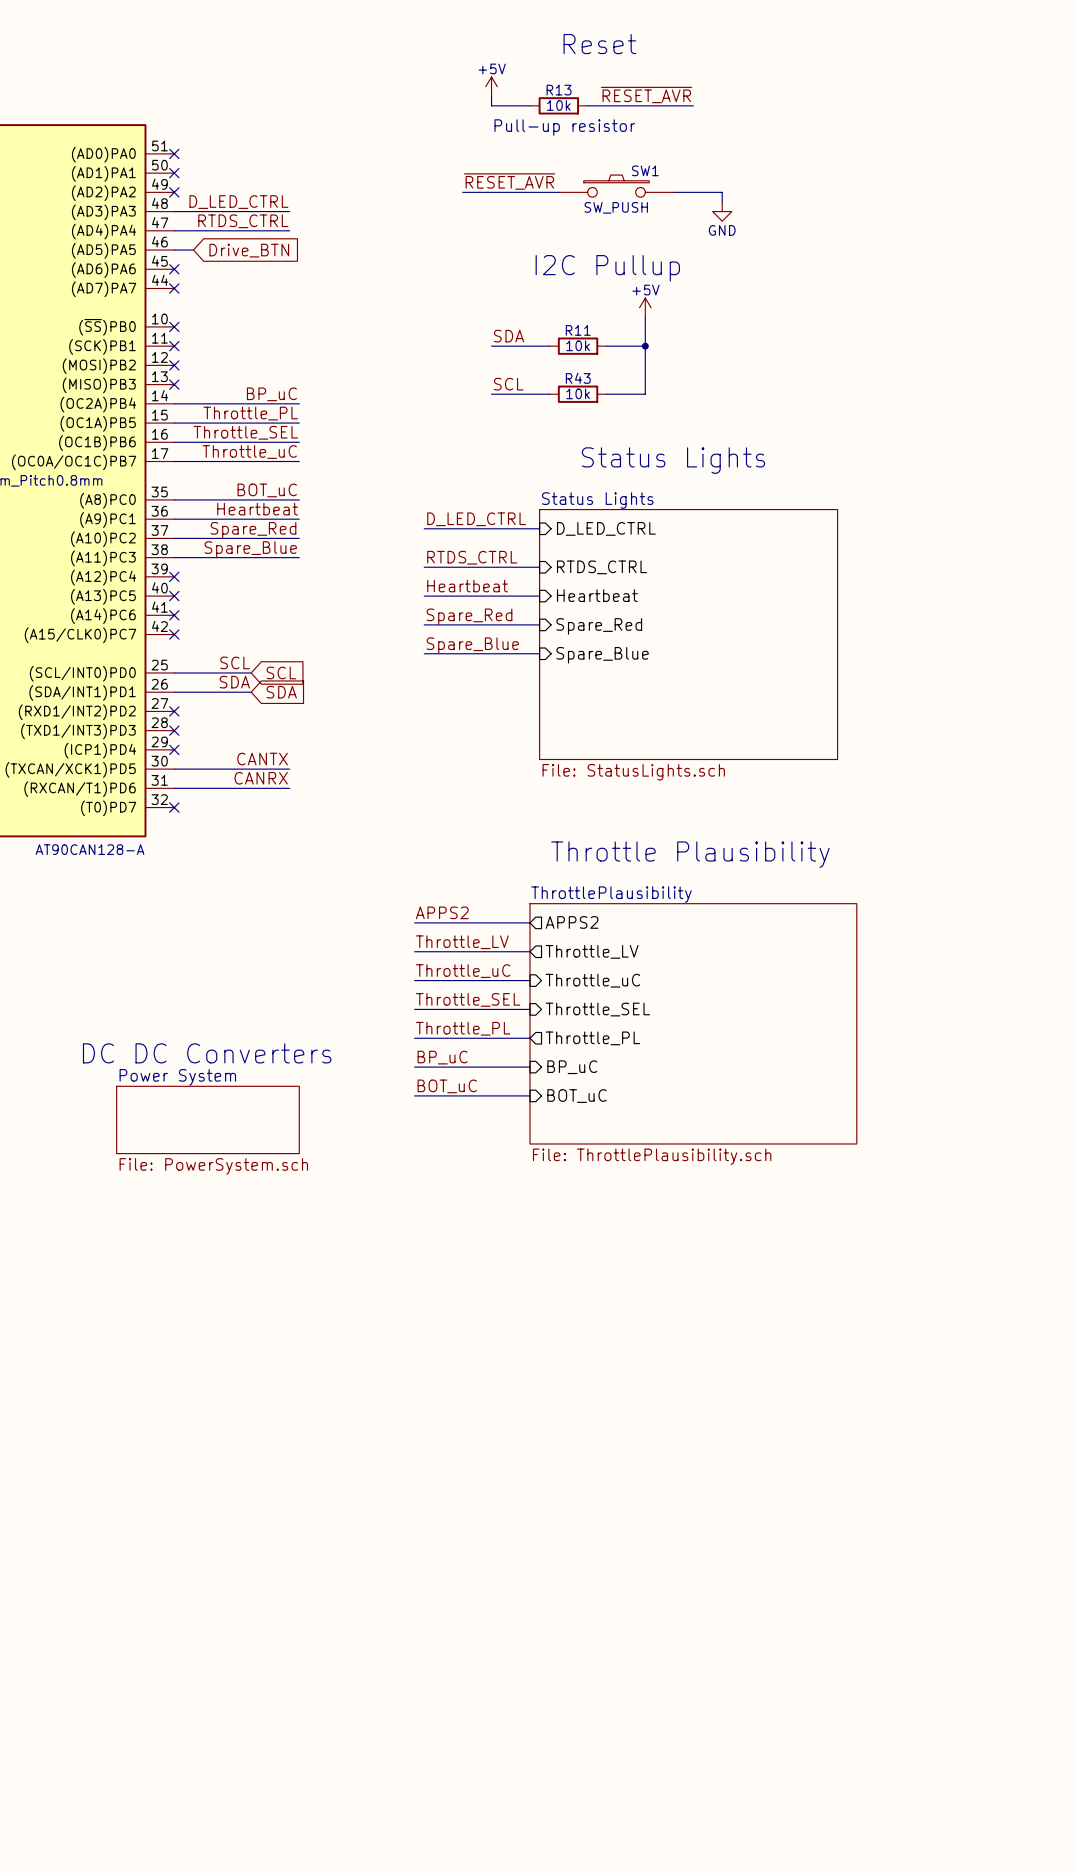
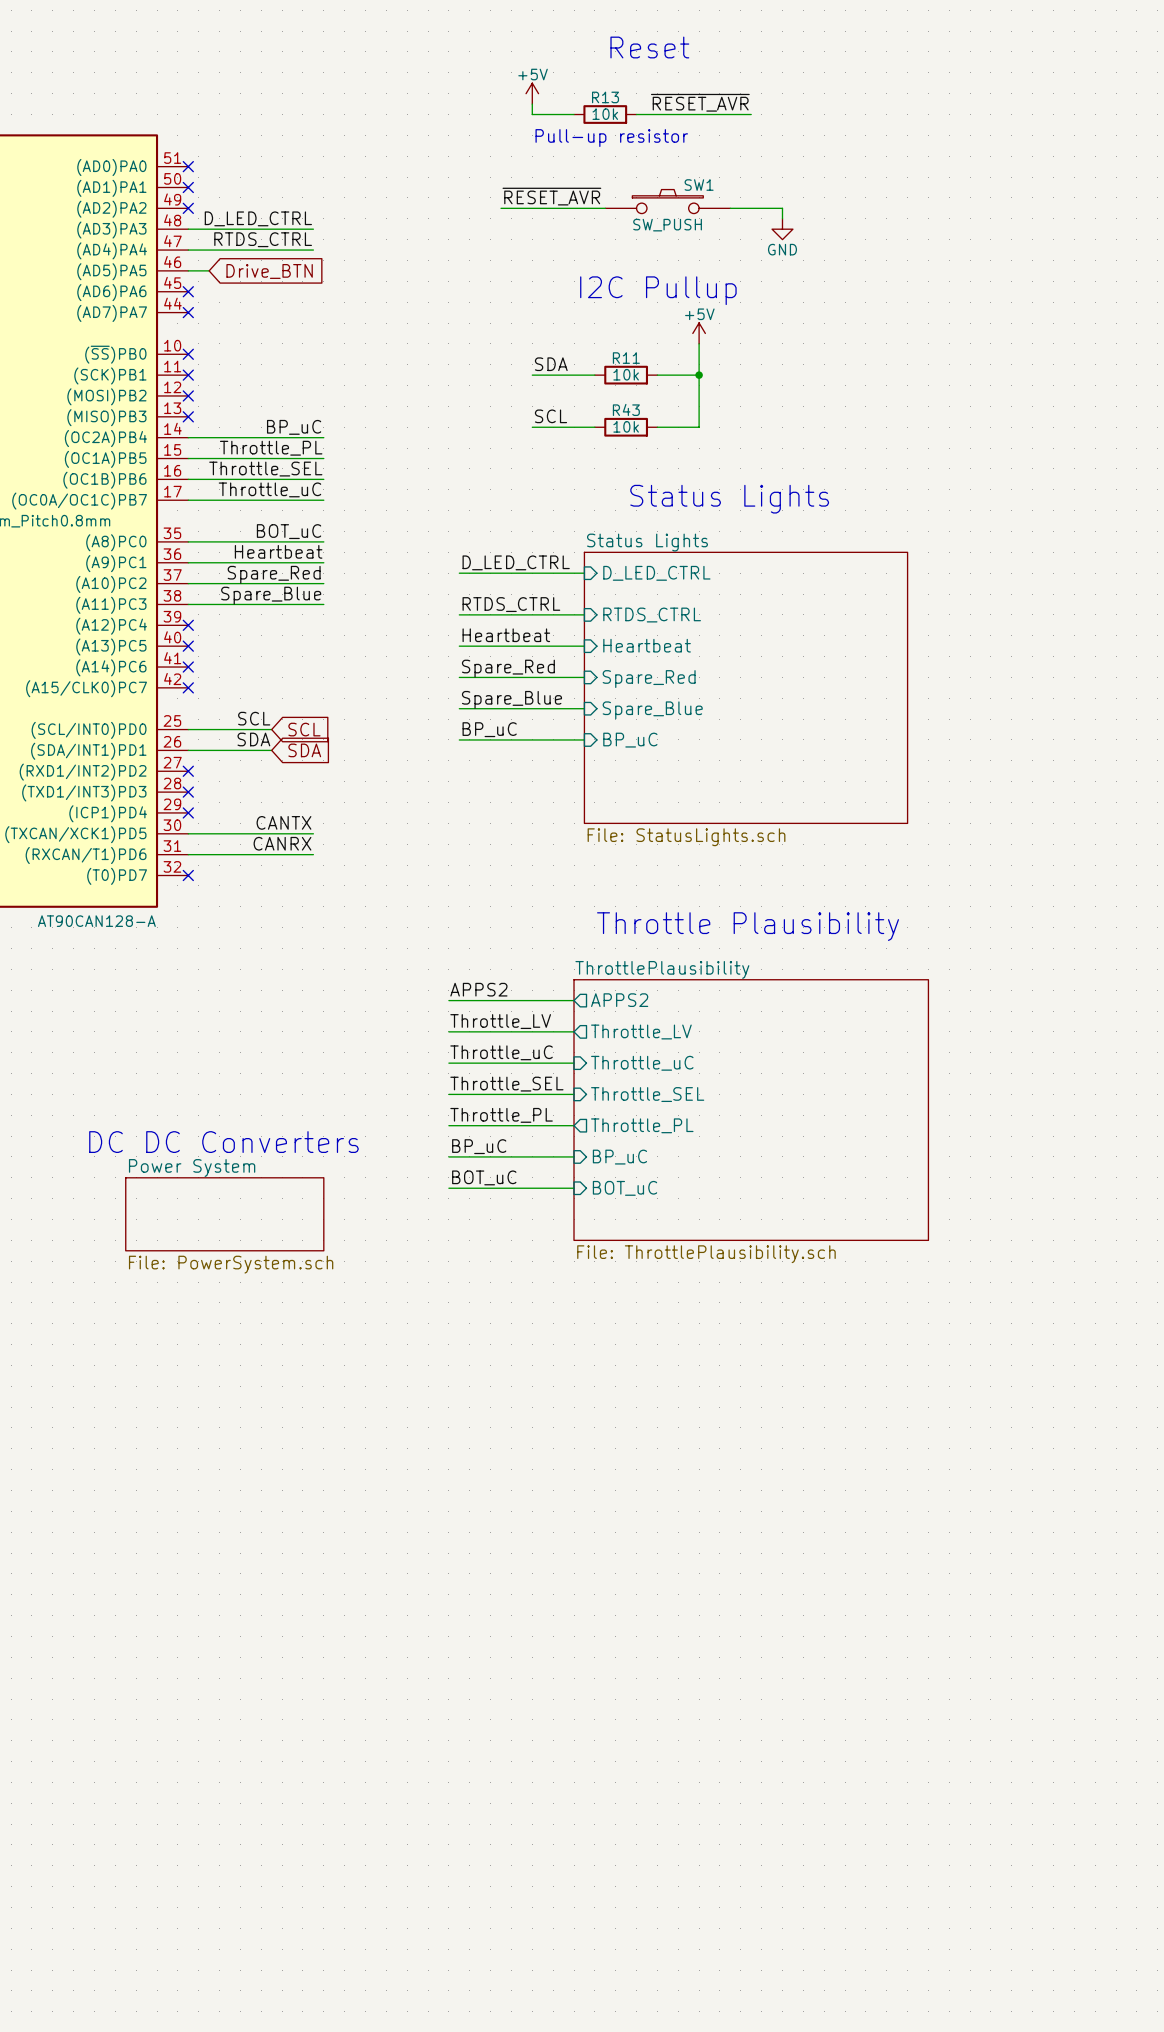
label: none -> BP_uC (489, 729)
wire: none -> (459, 739) (584, 739)
sheet pin: none -> BP_uC (630, 740)

